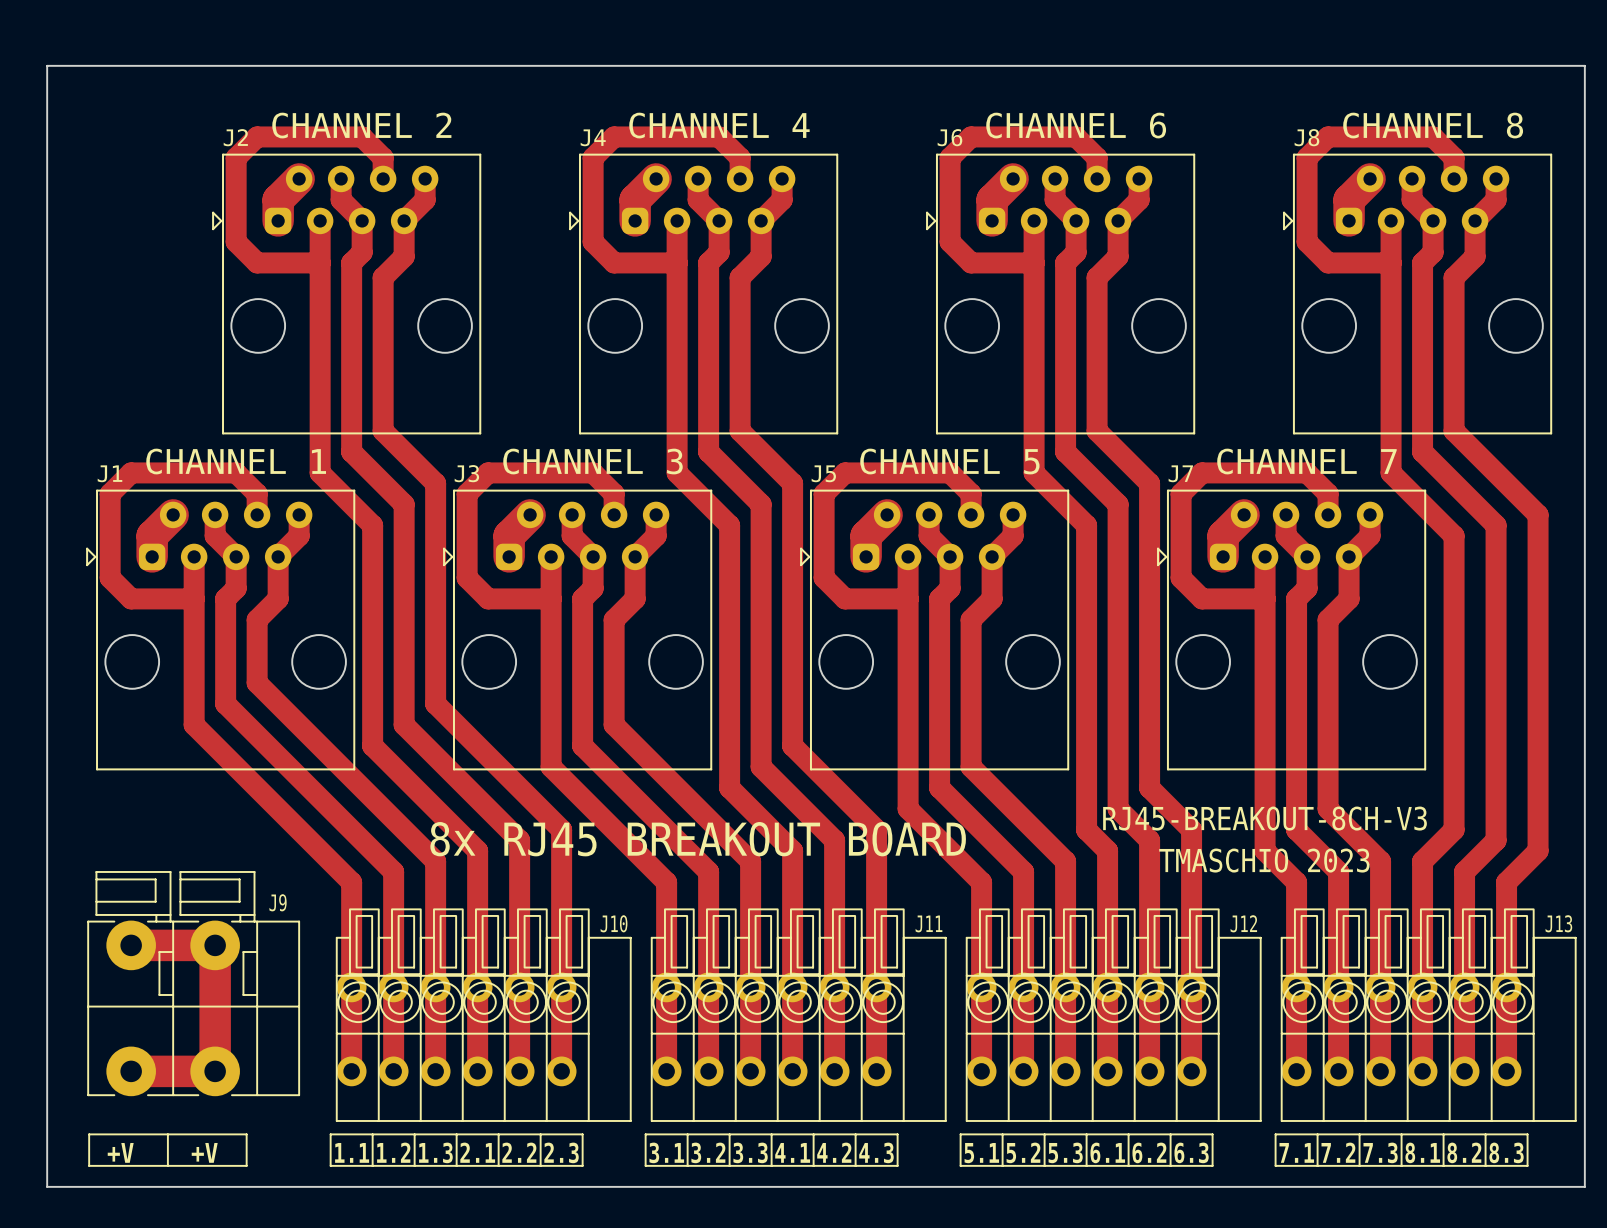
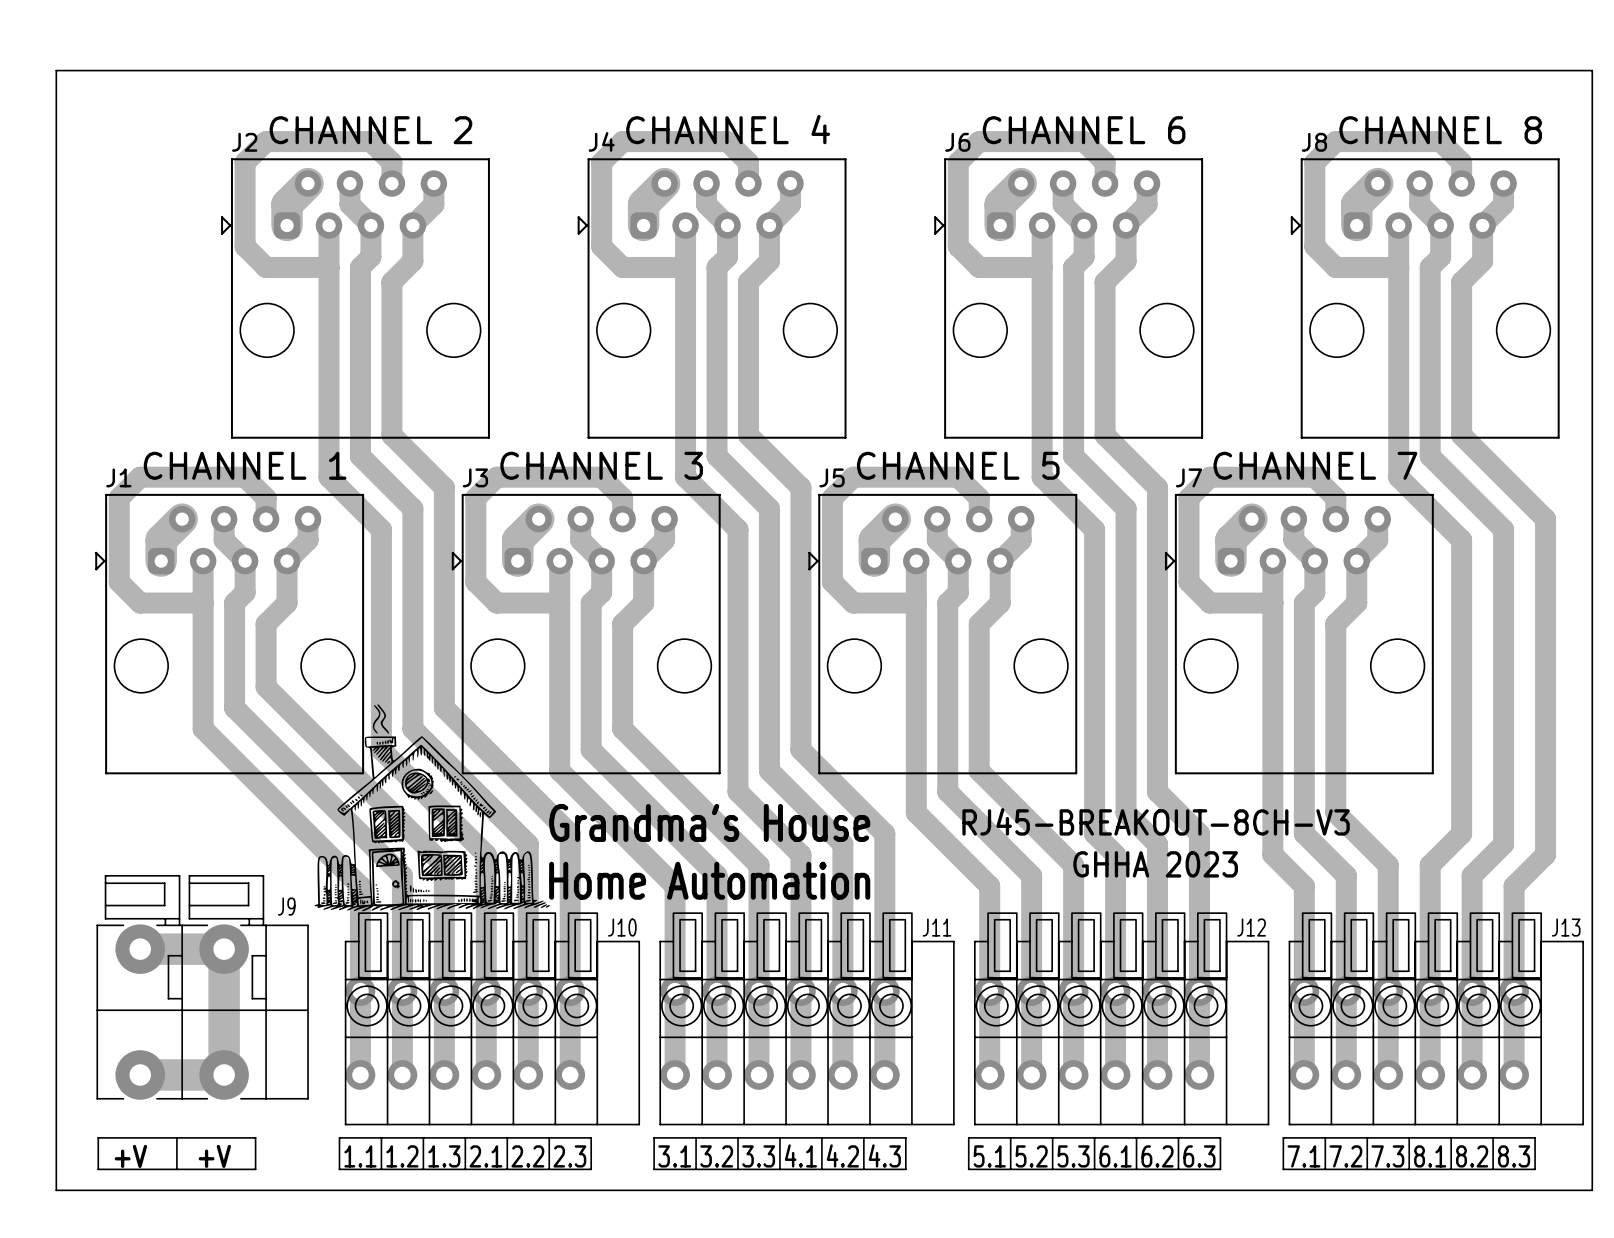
drawing: none -> [314, 704, 550, 912]
text position: RJ45-BREAKOUT-8CH-V3 (1265, 818) -> RJ45-BREAKOUT-8CH-V3 (1156, 821)
text: 8x RJ45 BREAKOUT BOARD (698, 839) -> Grandma's House (709, 822)
text: none -> GHHA 2023 (1155, 864)
text: TMASCHIO 2023 (1264, 860) -> none
text: none -> Home Automation (709, 880)

